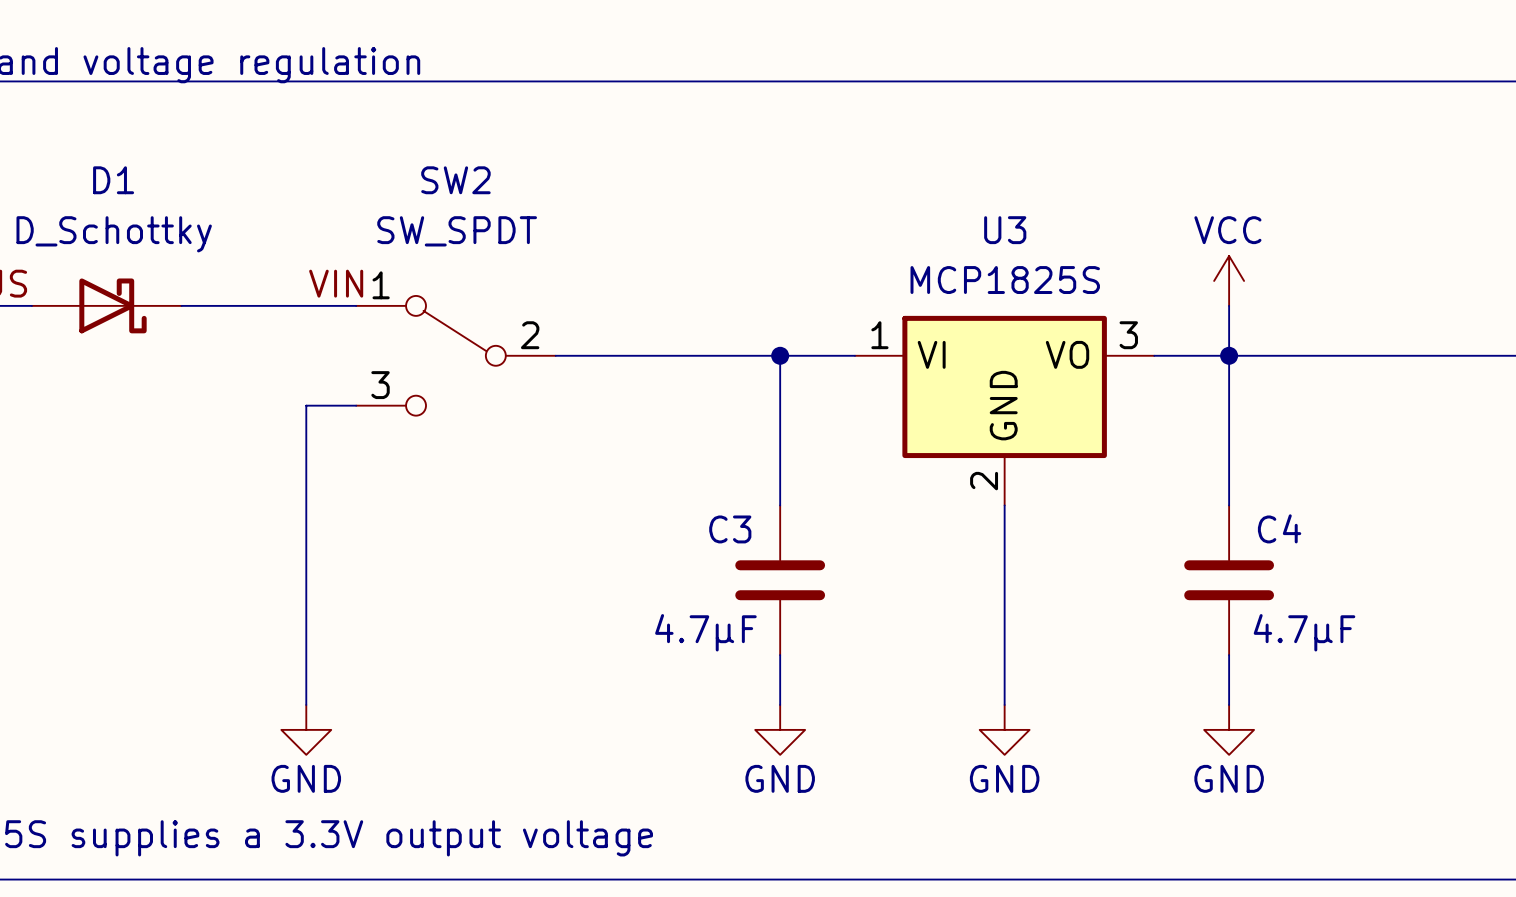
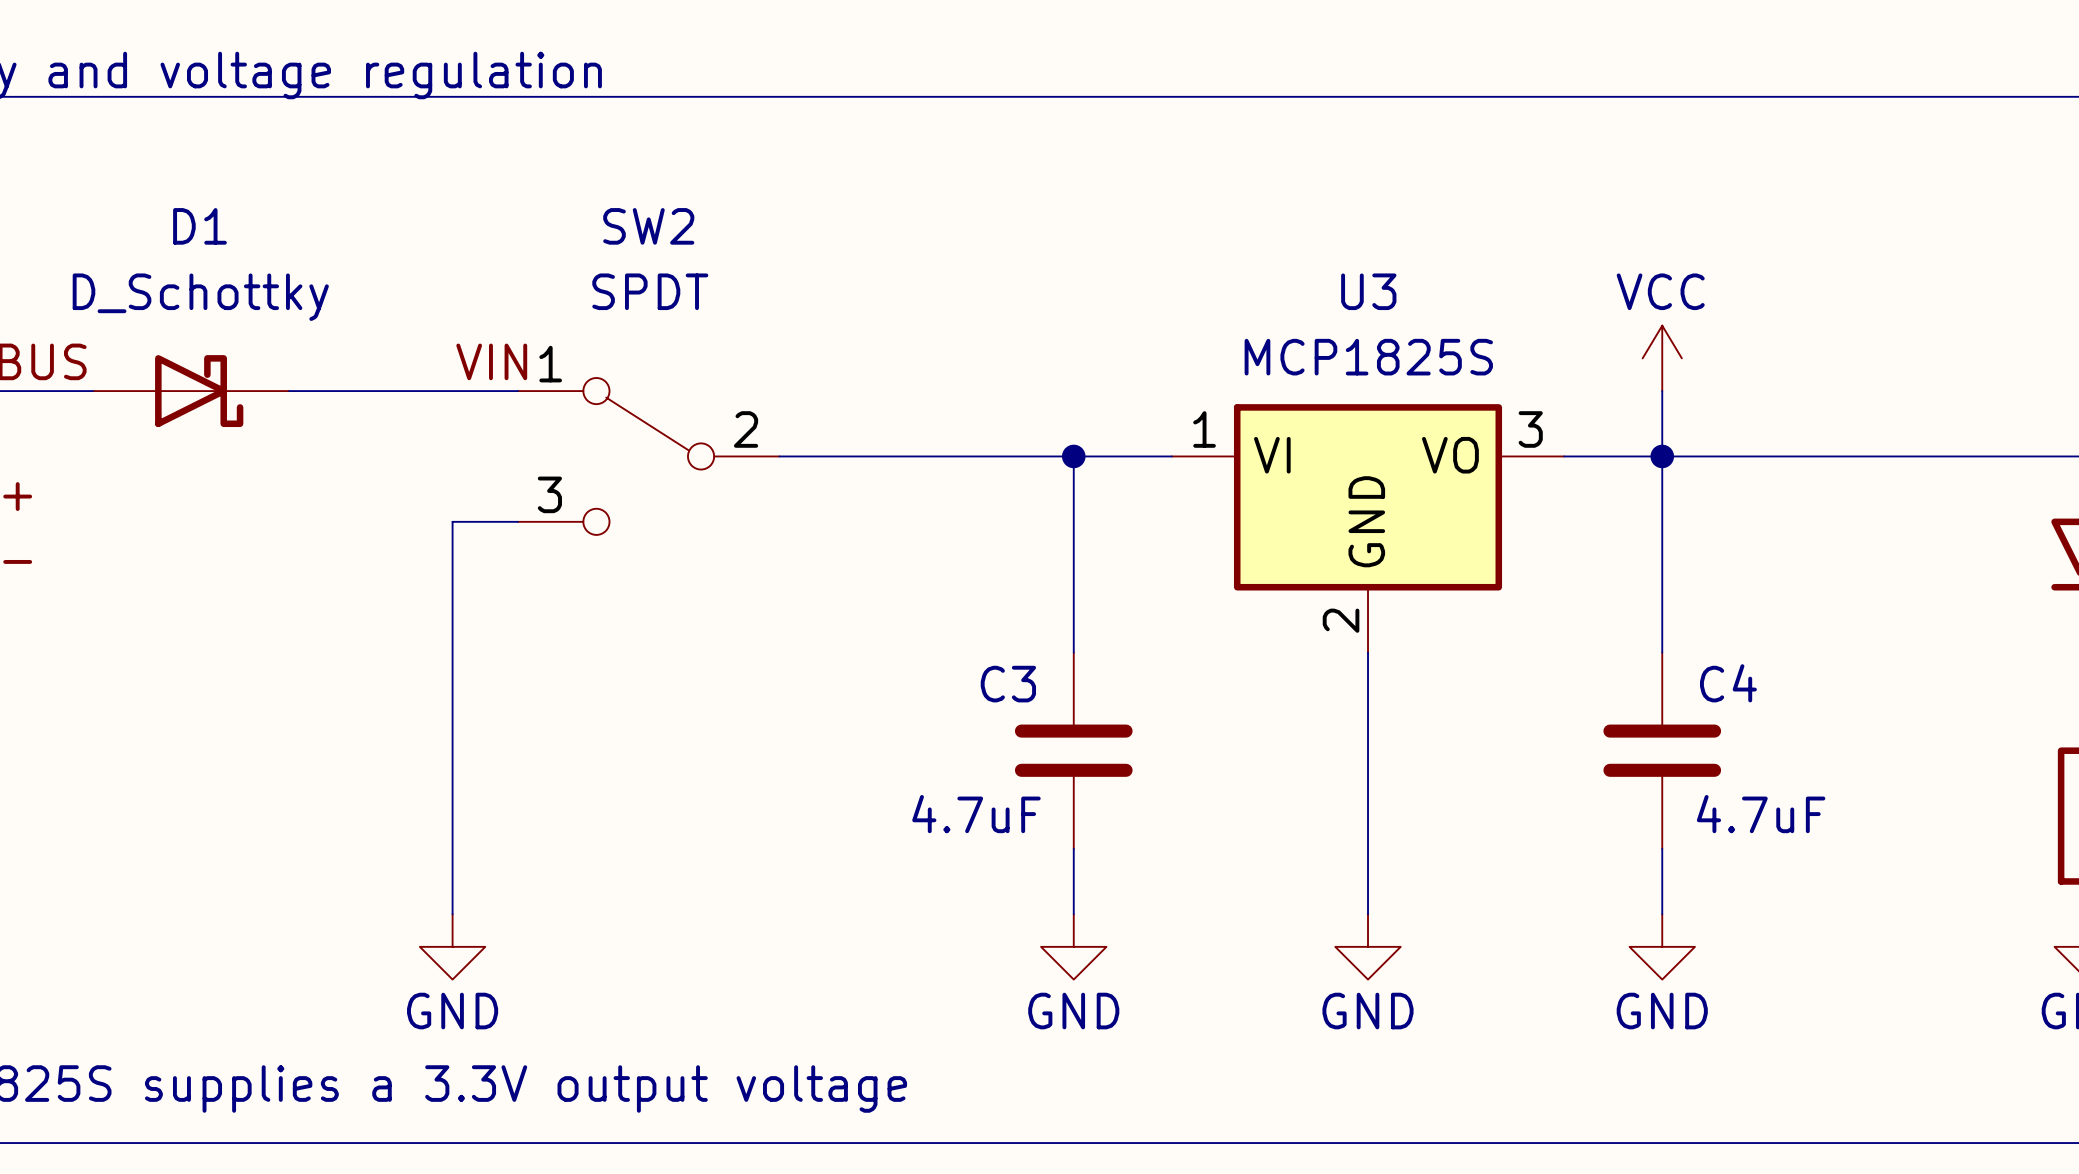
SW2 value: SW_SPDT (457, 231) -> SPDT (650, 291)
C3 value: 4.7μF (705, 632) -> 4.7uF (976, 814)
C4 value: 4.7μF (1304, 632) -> 4.7uF (1761, 814)

